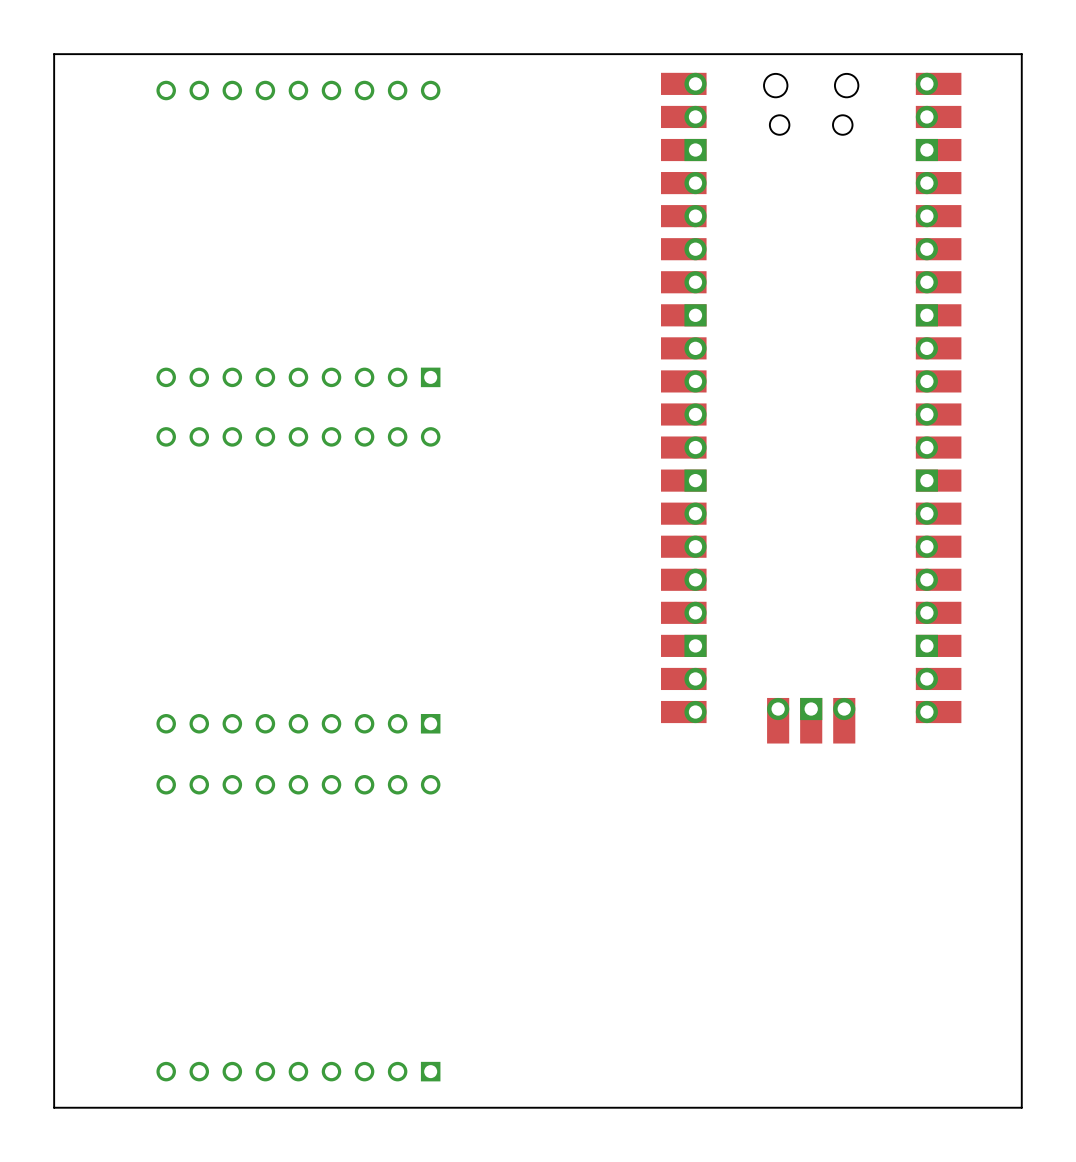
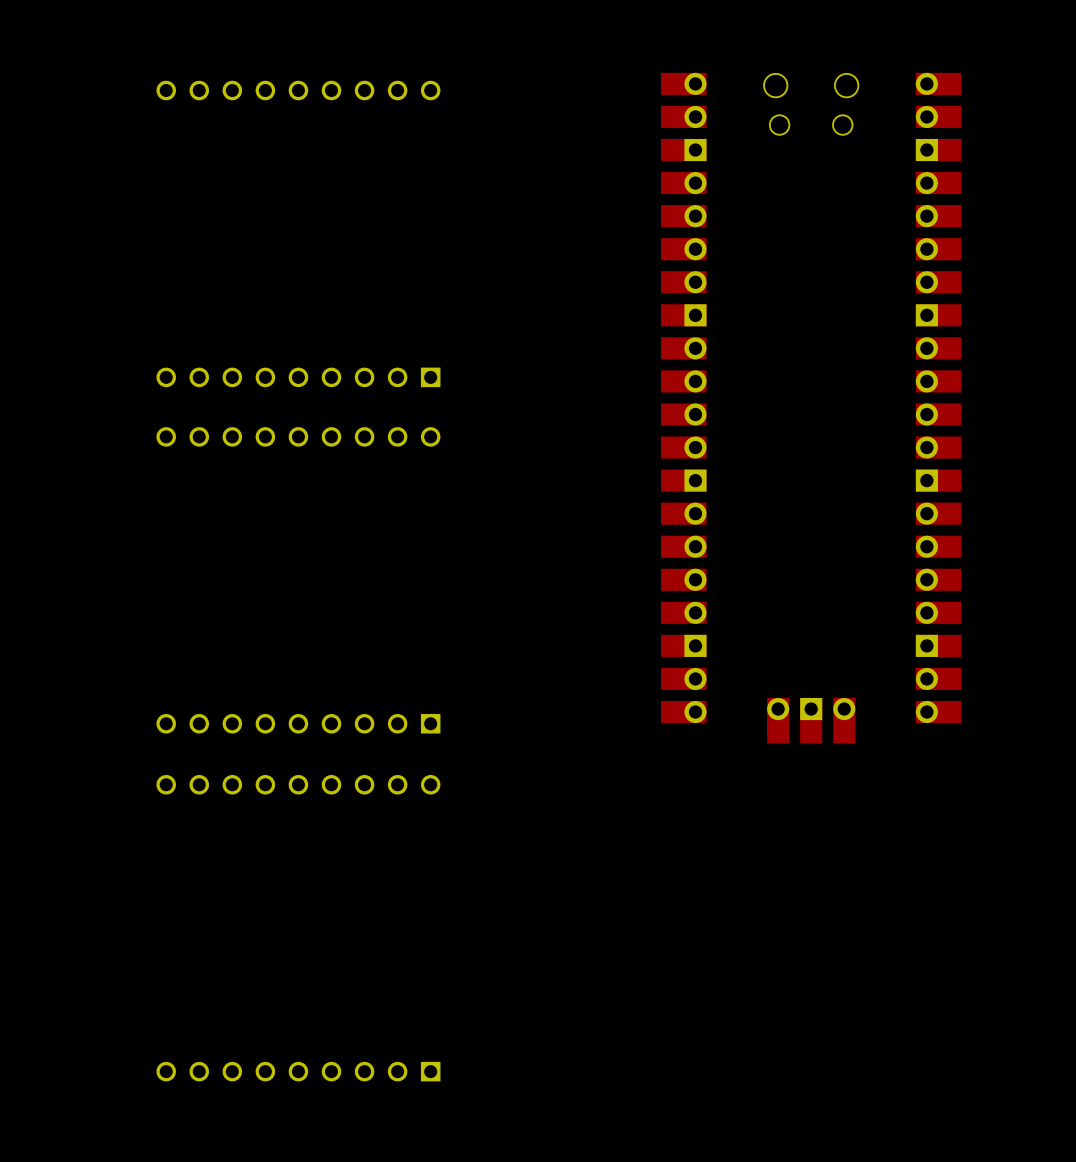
board edge: (1021, 54) (54, 54) (54, 1107) (1021, 1107) (1021, 54) -> none

